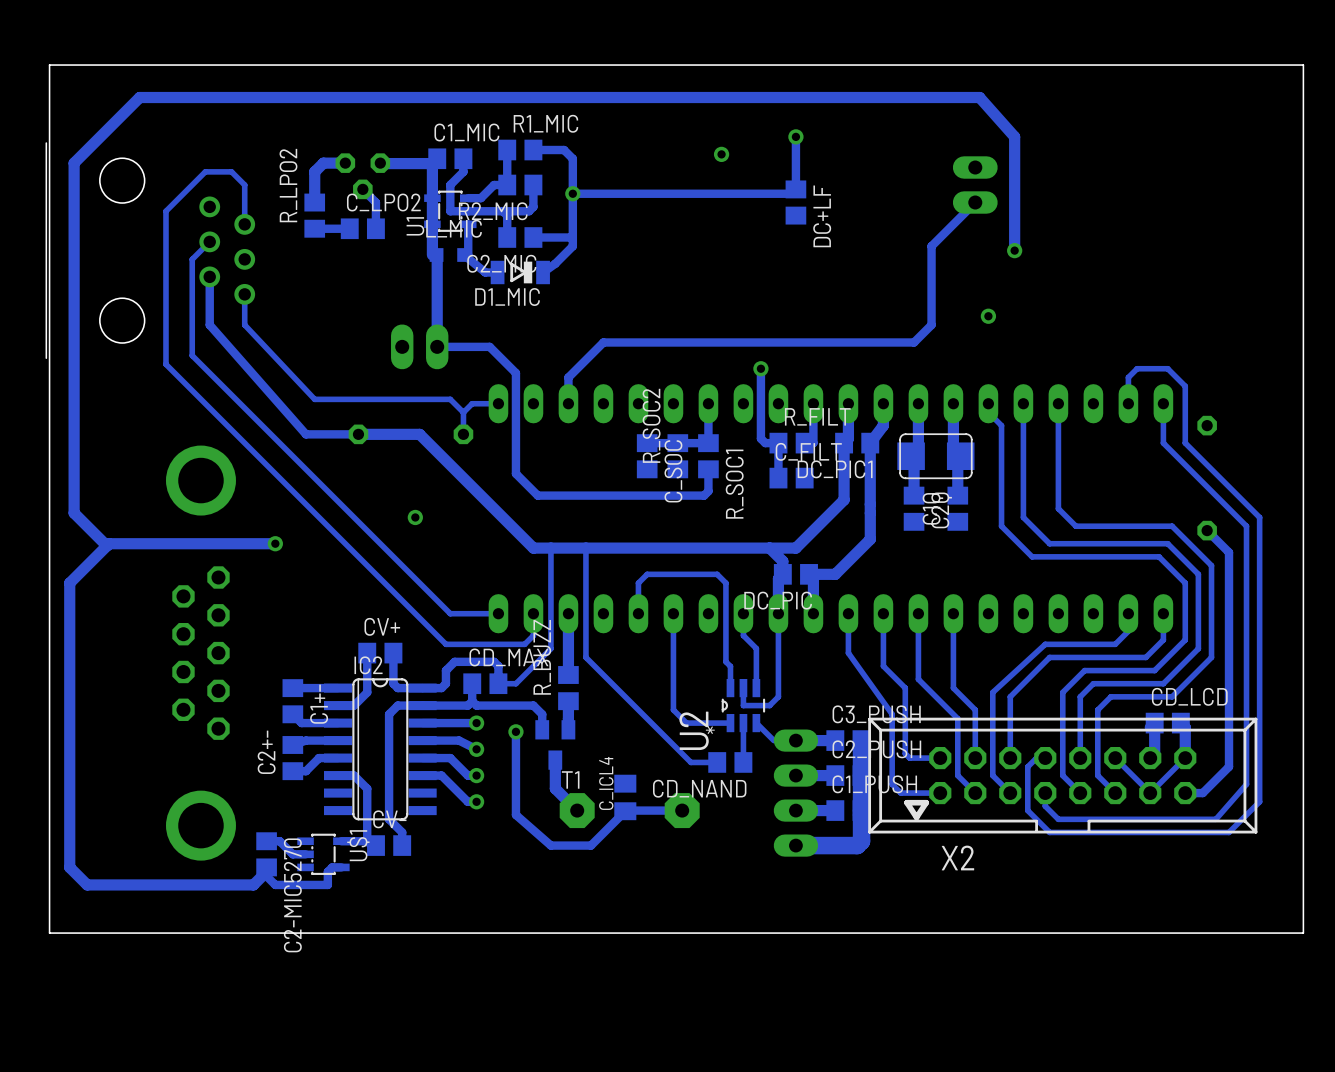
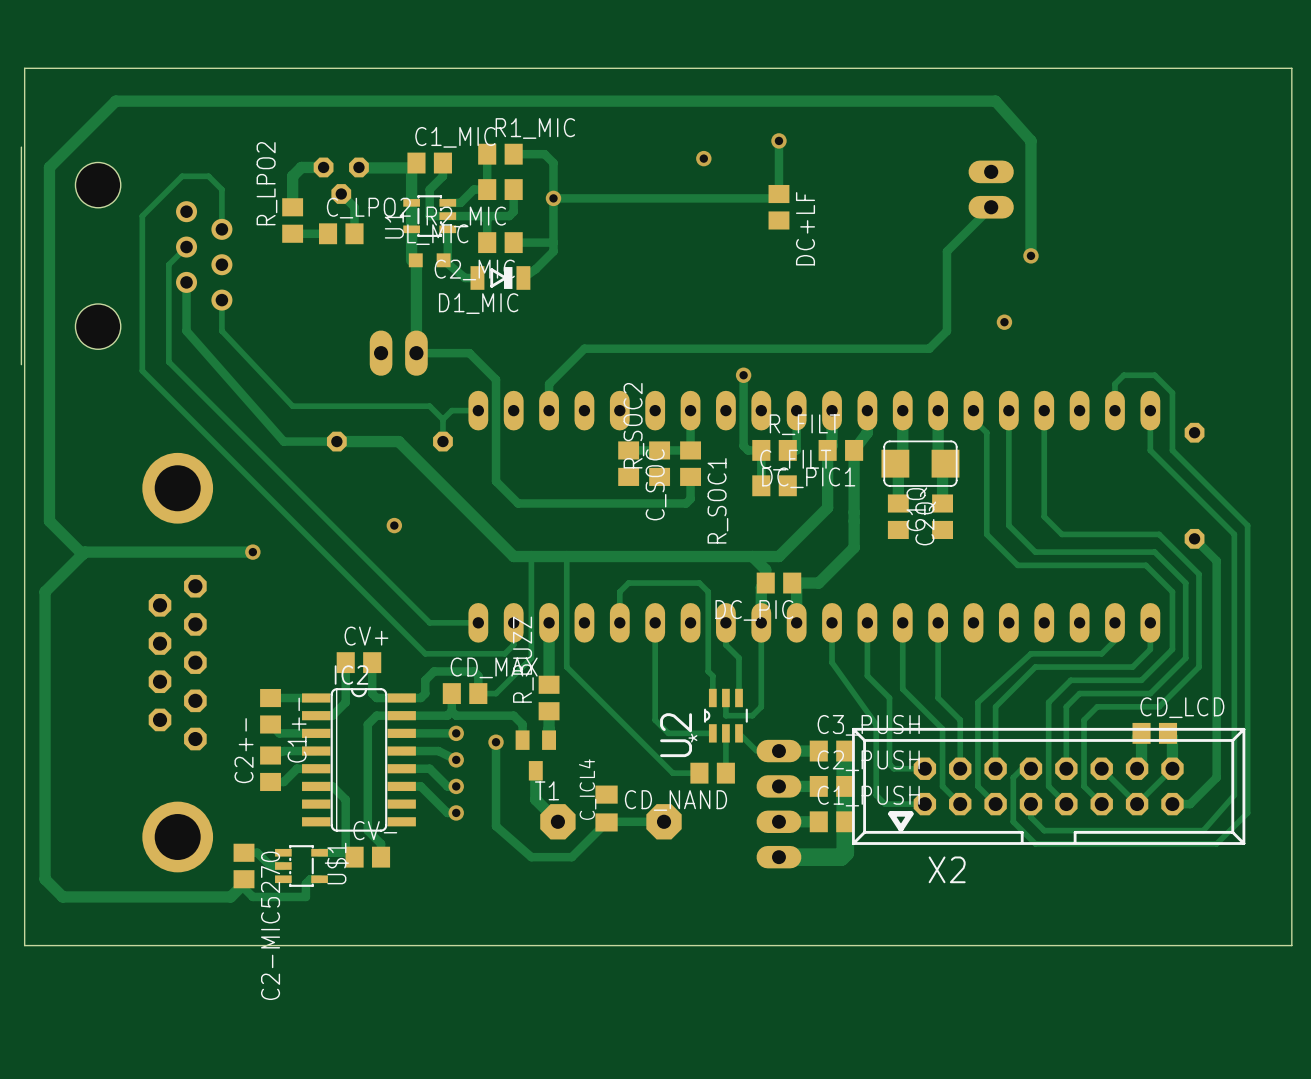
track: (979, 97) (1014, 136) (1014, 250) -> (964, 101) (995, 101) (1030, 140) (1030, 255)
part position: (975, 185) -> (991, 189)
track: (975, 202) (931, 246) (931, 324) (914, 342) -> (991, 207) (946, 251) (946, 331) (929, 348) (898, 348)
via position: (1014, 250) -> (1030, 255)
via position: (988, 316) -> (1004, 322)

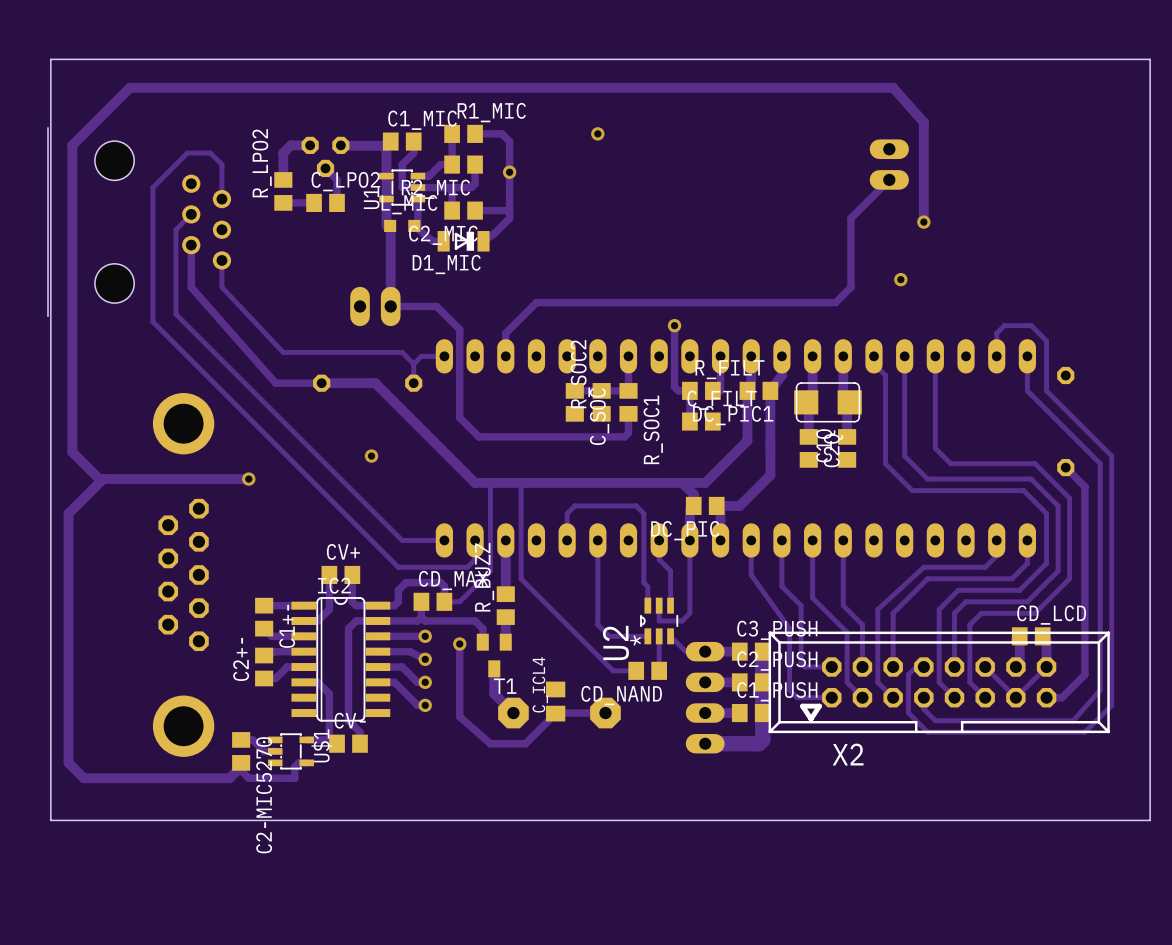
track: (778, 140) (778, 189) -> none
via: (778, 140) -> none
via position: (703, 158) -> (597, 133)
track: (778, 194) (774, 198) (553, 198) -> none
DC+LF: (778, 207) -> none

